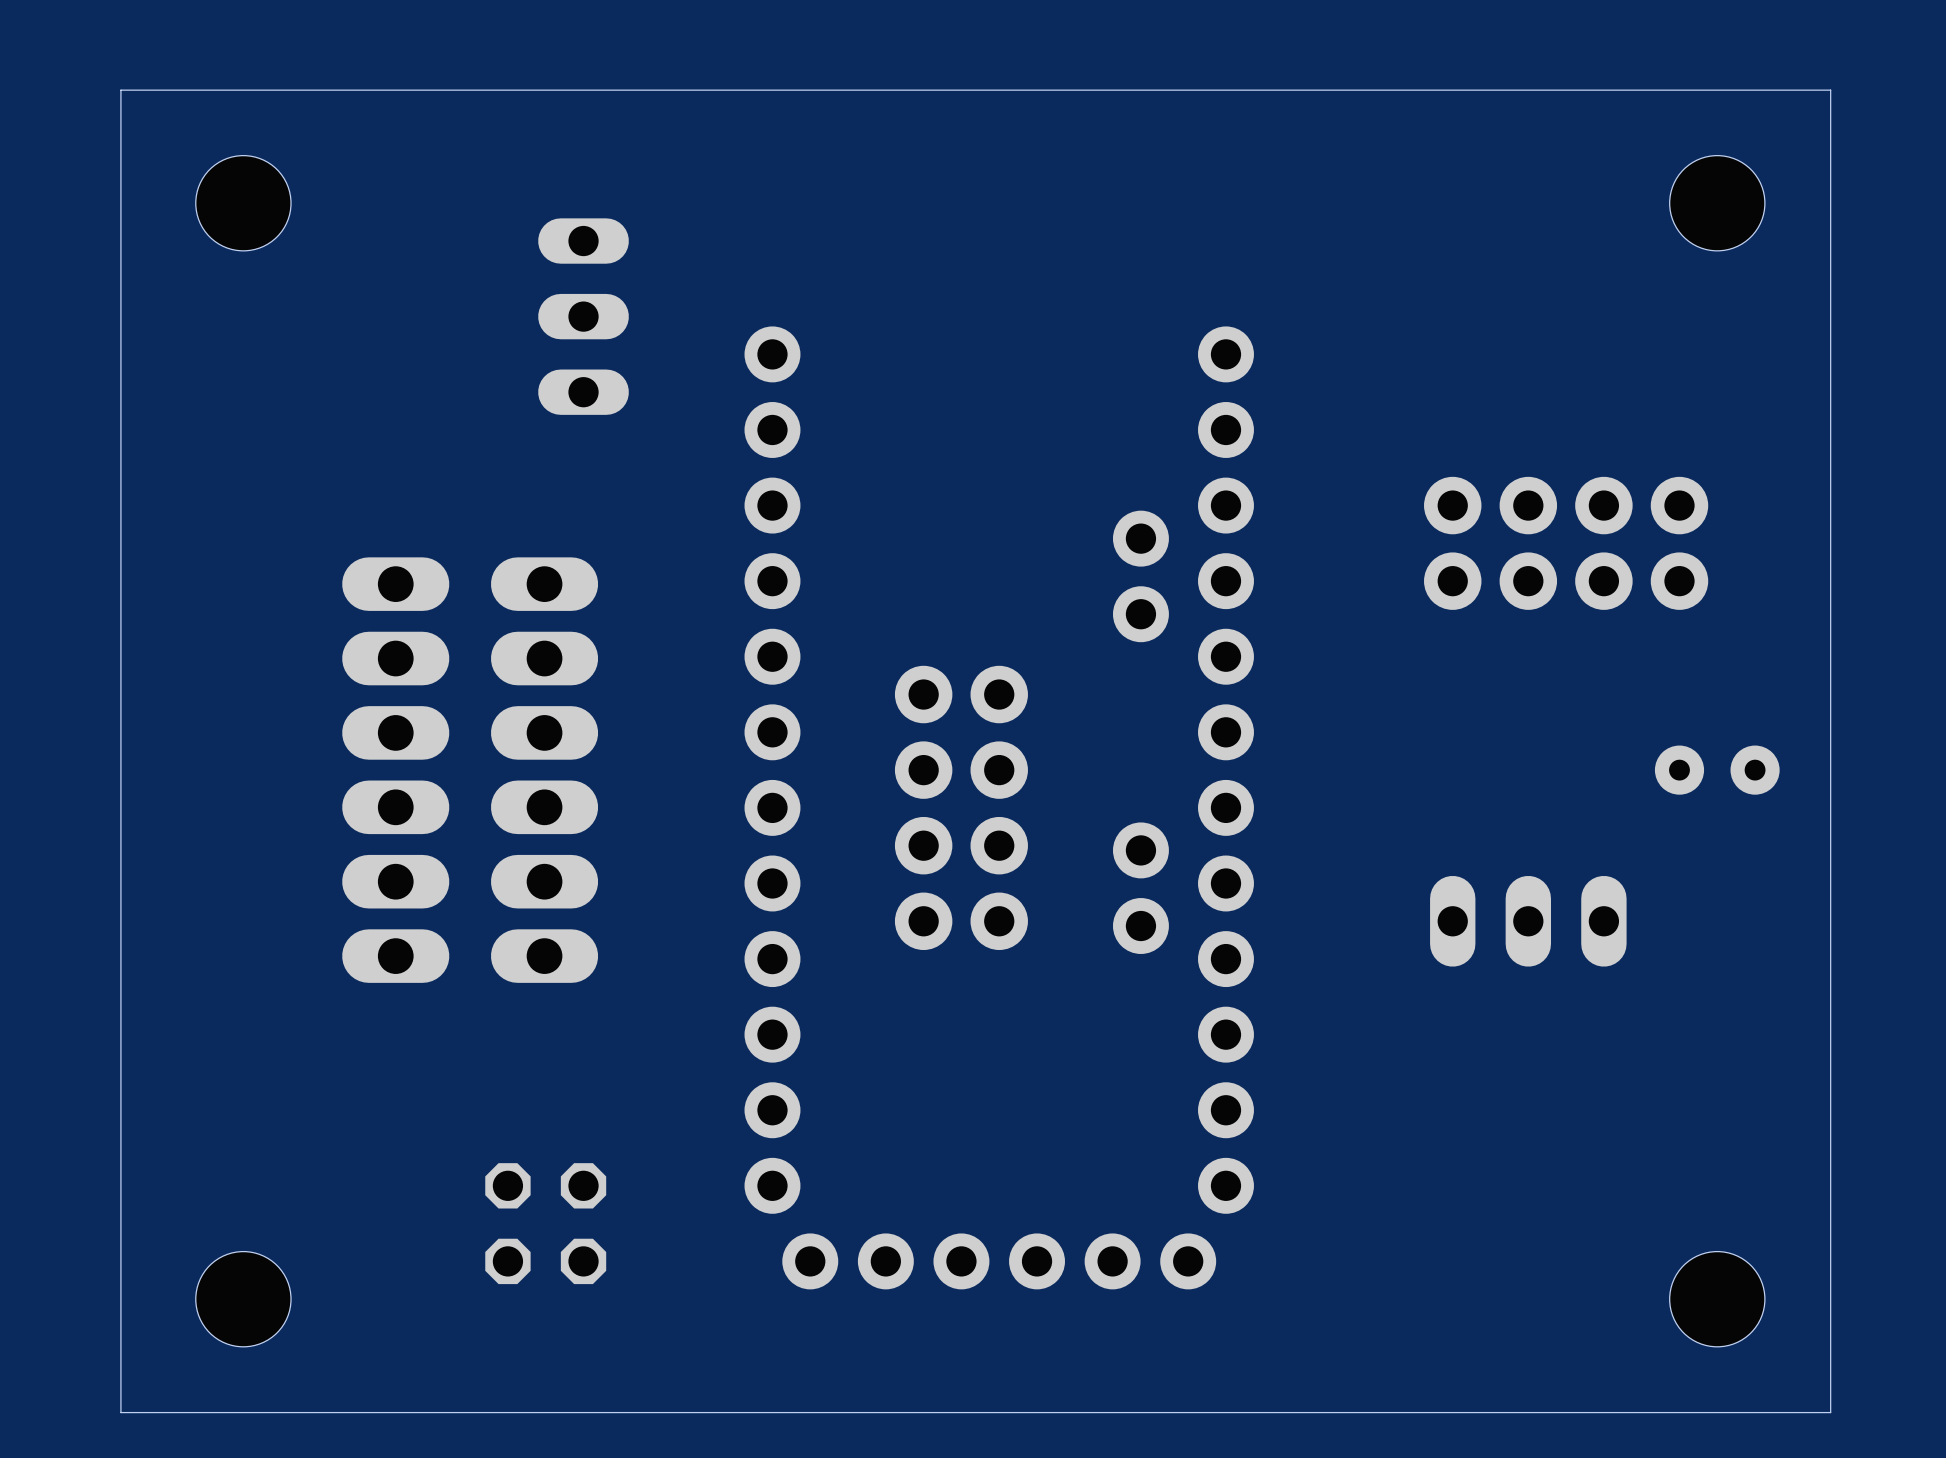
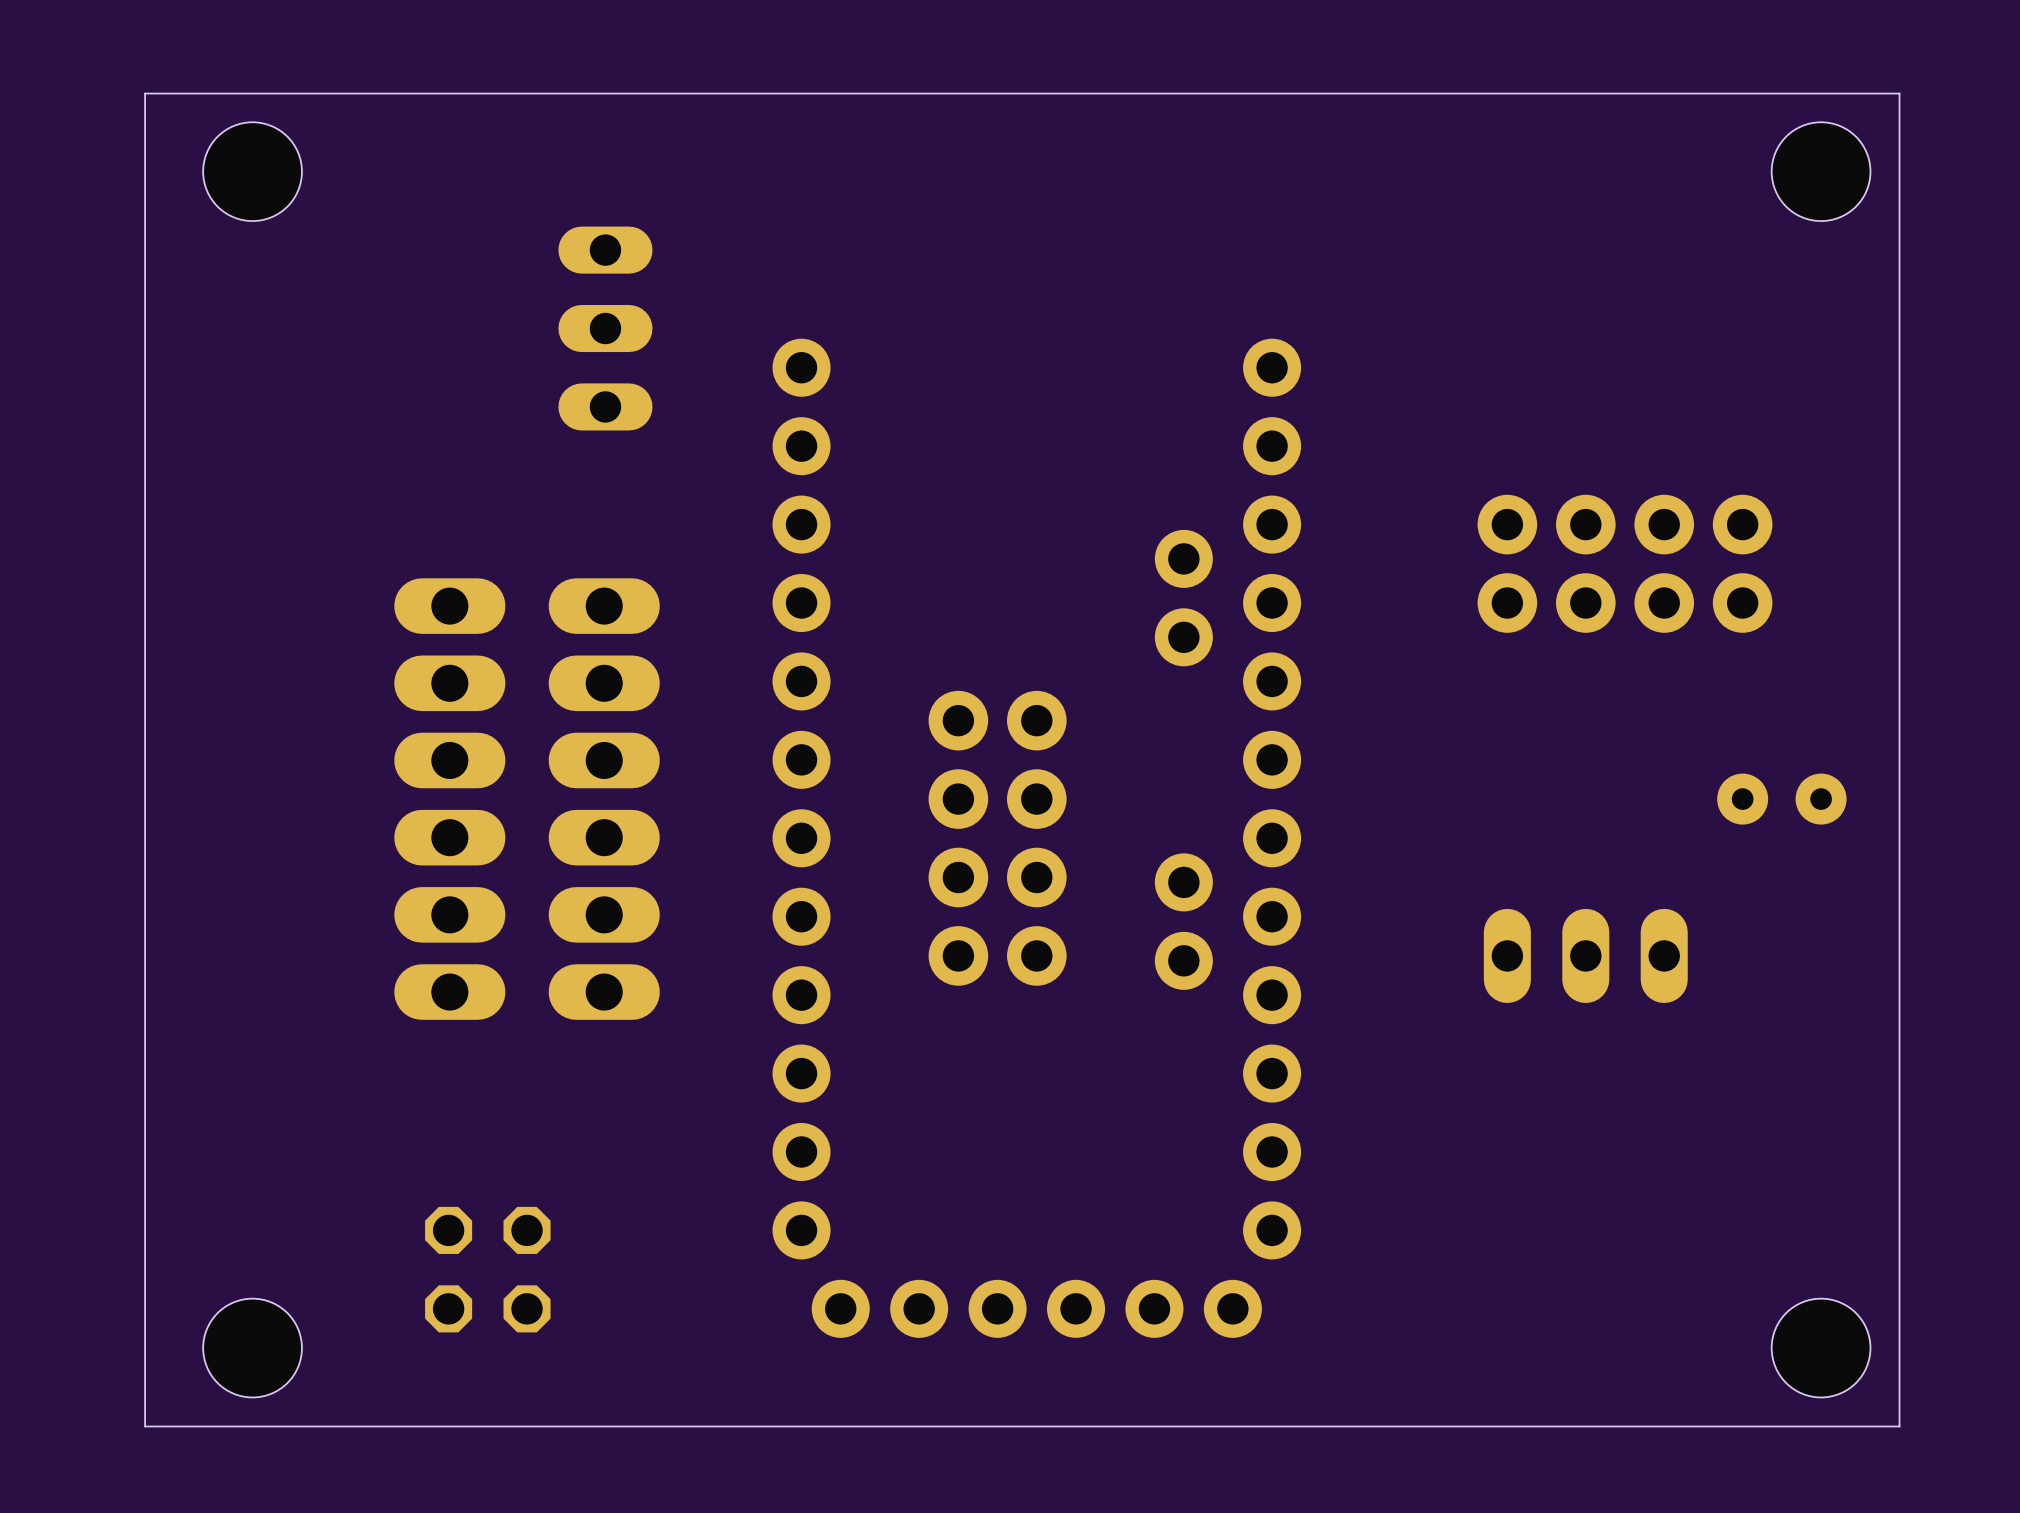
board edge: (139, 90) (120, 90) (120, 1412) (1830, 1412) (1830, 1374) -> (145, 93) (145, 1426) (1899, 1426)
hole position: (243, 203) -> (252, 171)
hole position: (1717, 203) -> (1821, 171)
part position: (470, 770) -> (527, 799)
part position: (545, 1223) -> (487, 1269)
hole position: (1717, 1299) -> (1821, 1348)

